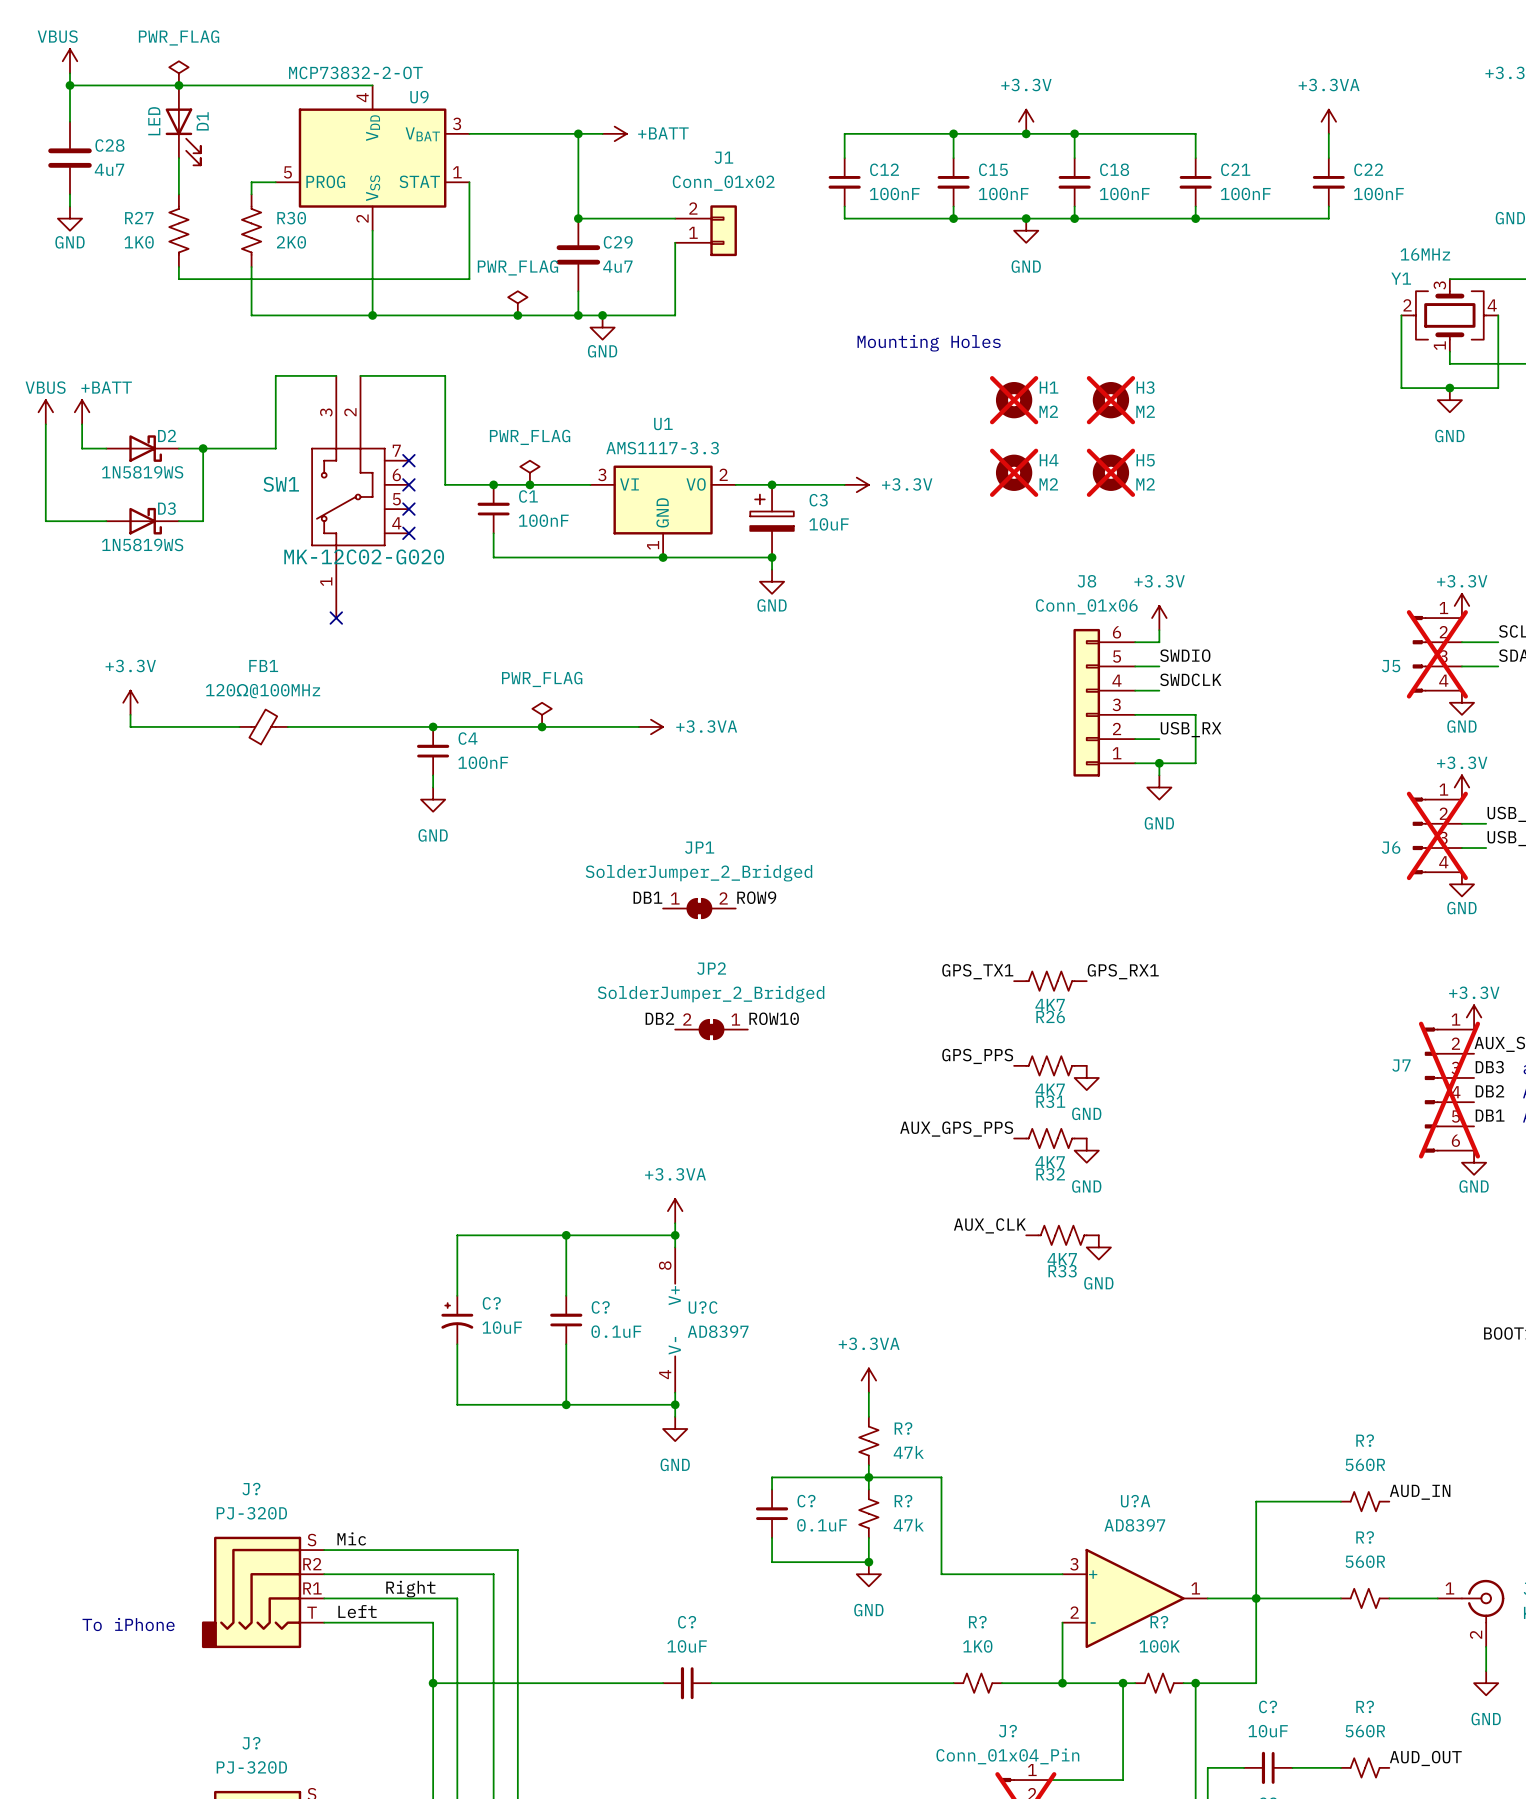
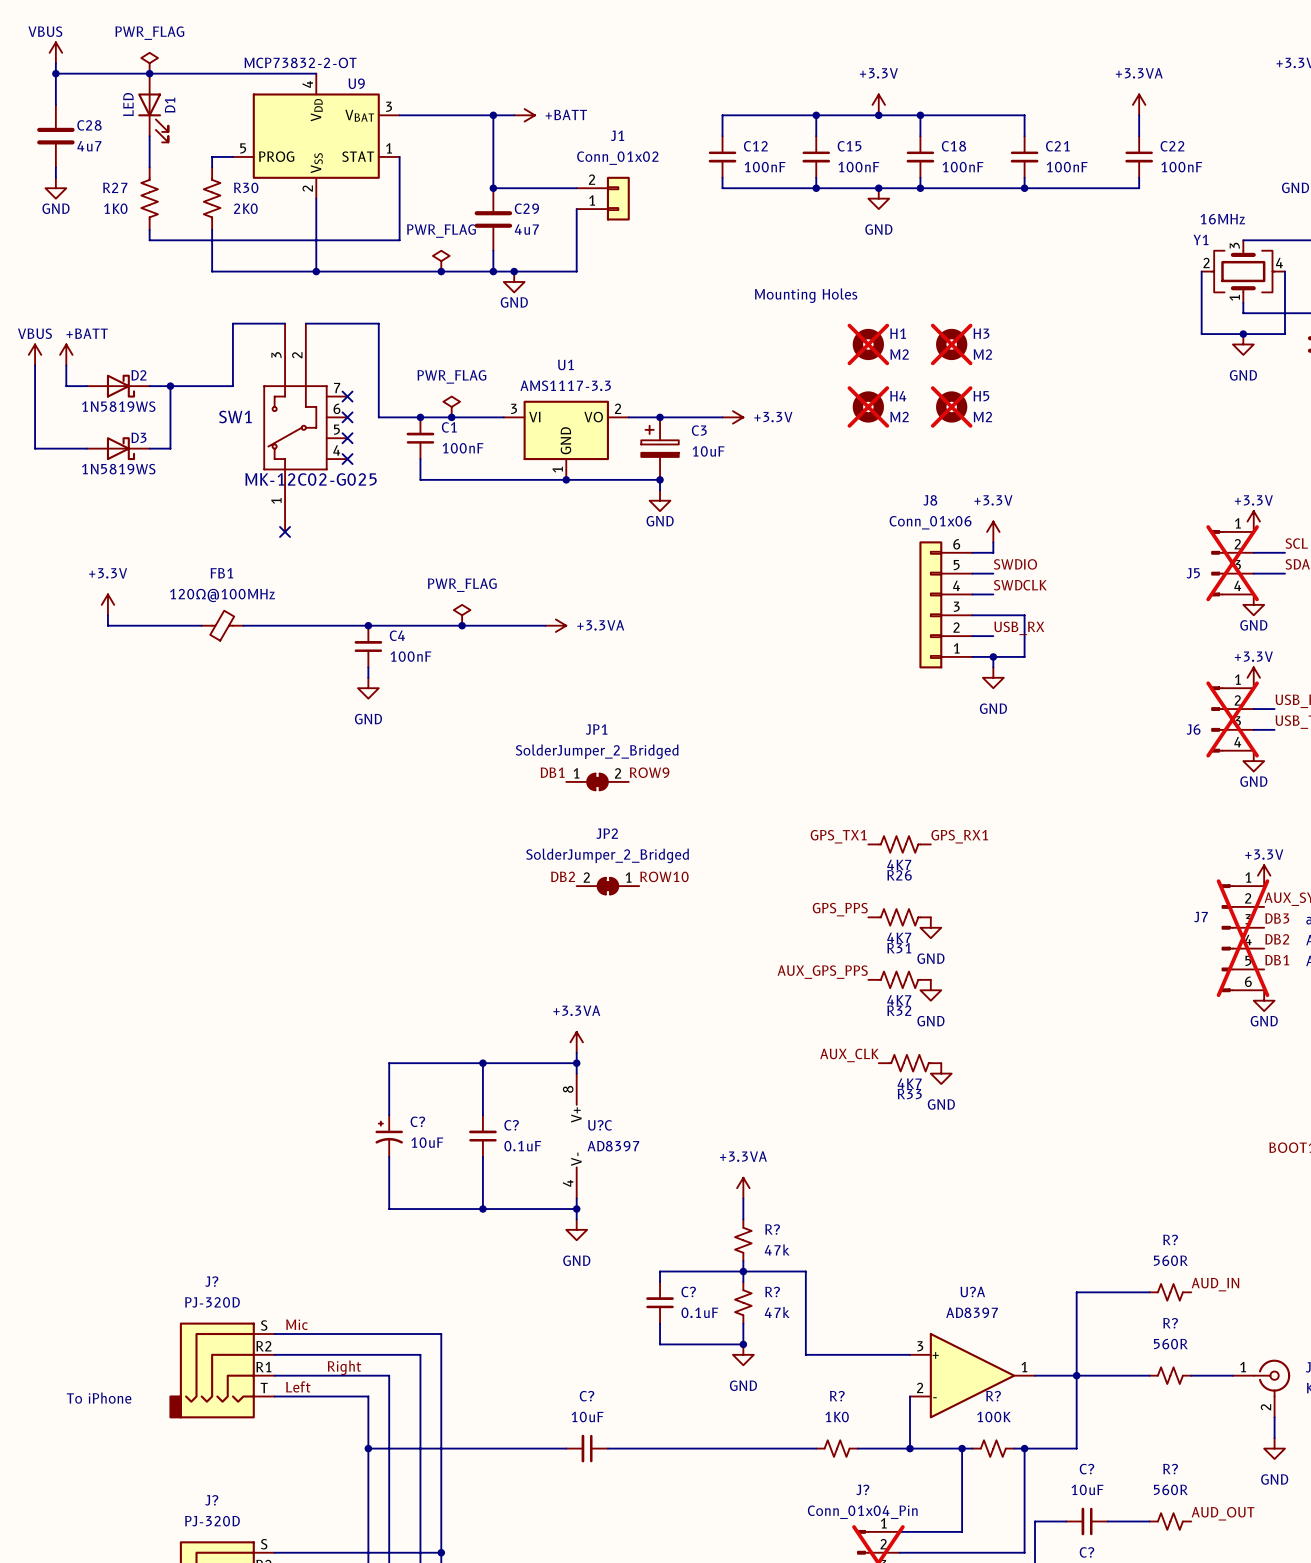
SW1 value: MK-12C02-G020 (364, 556) -> MK-12C02-G025 (311, 479)

